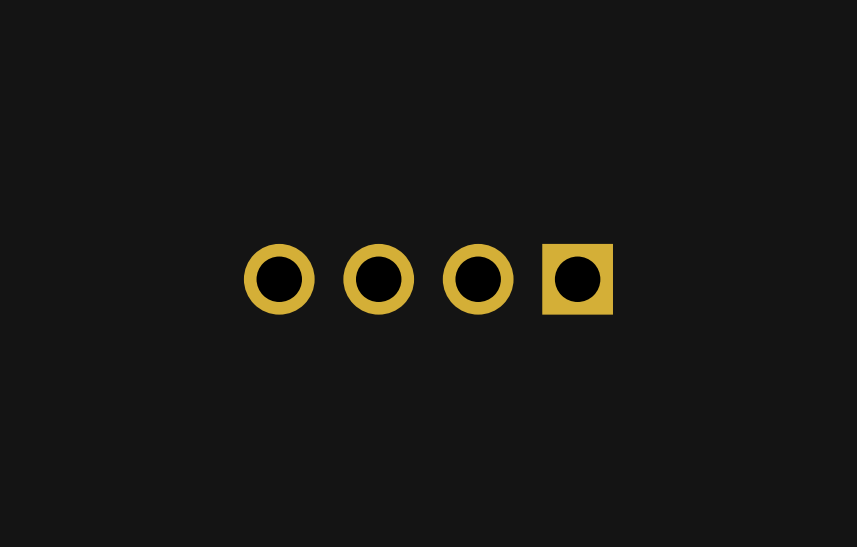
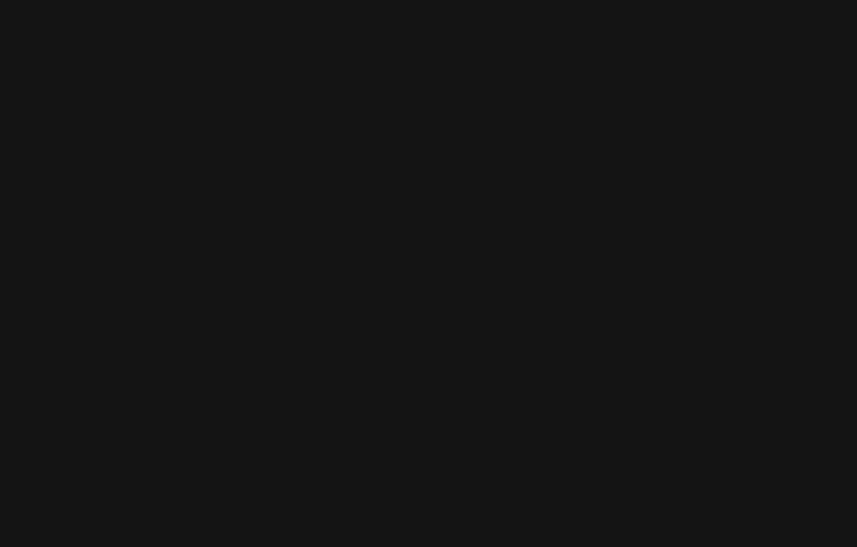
part: (428, 279) -> none

